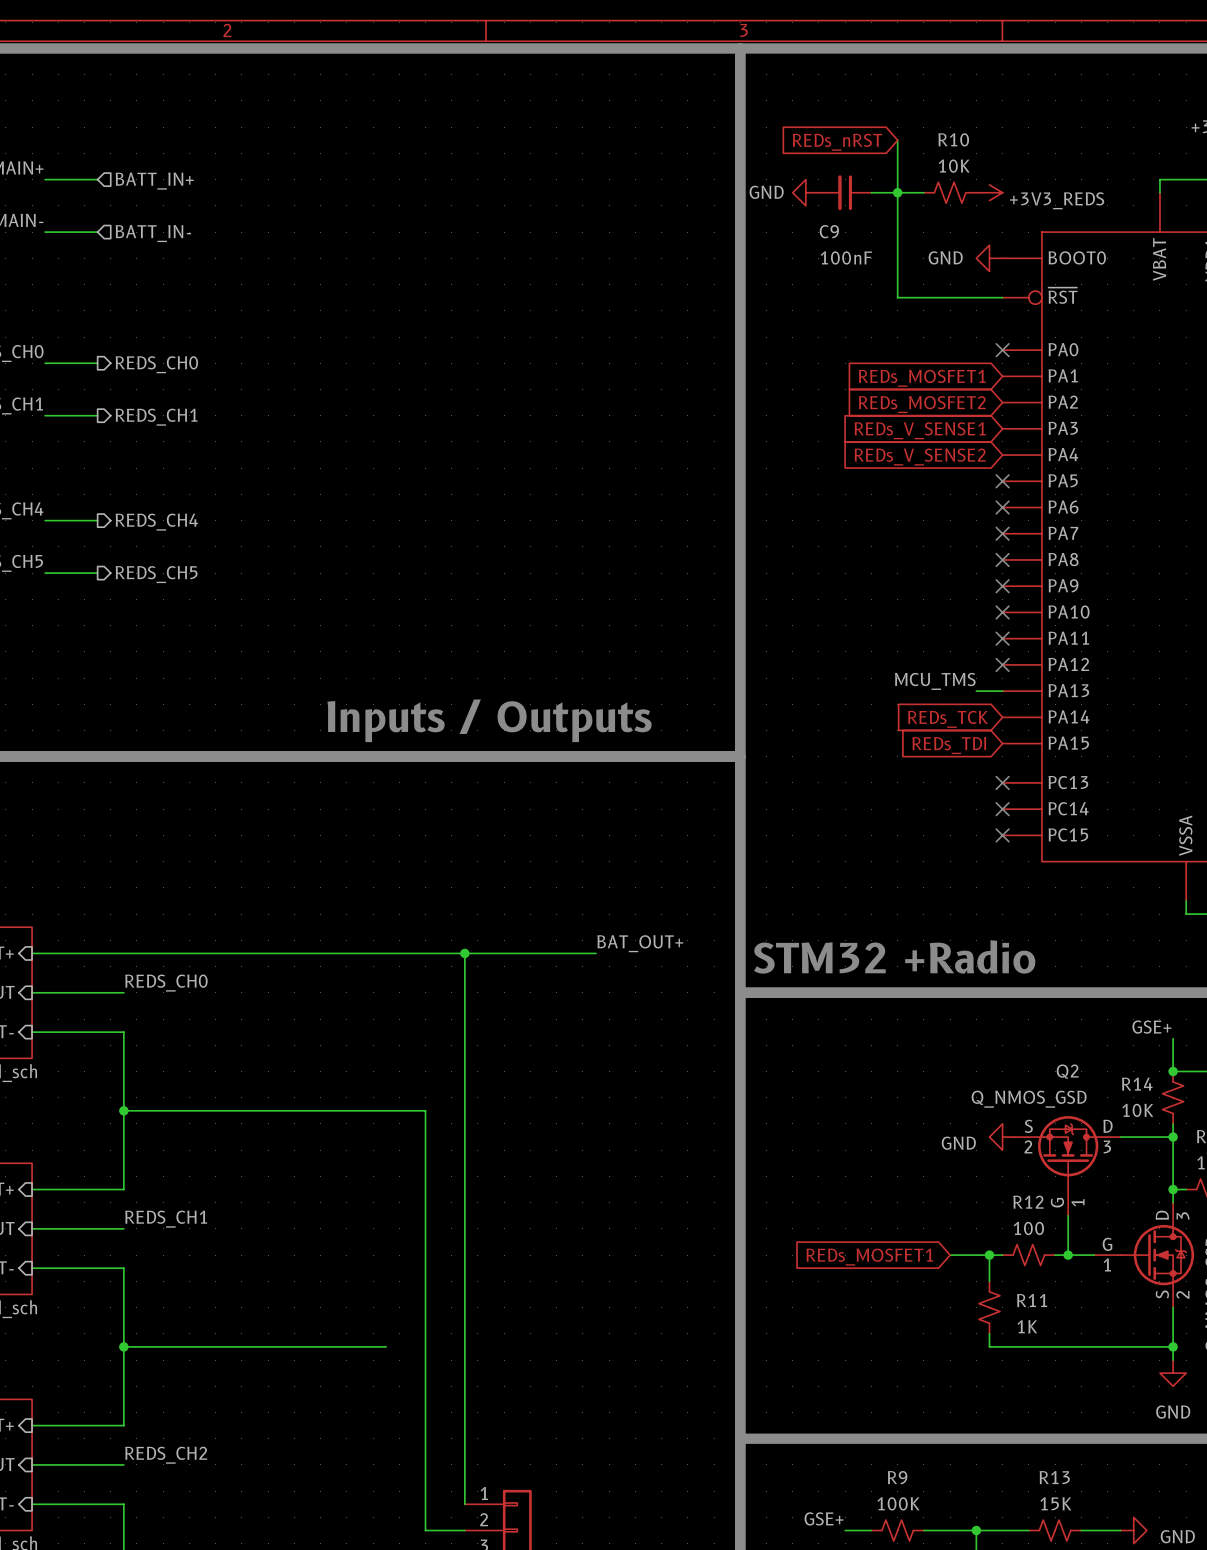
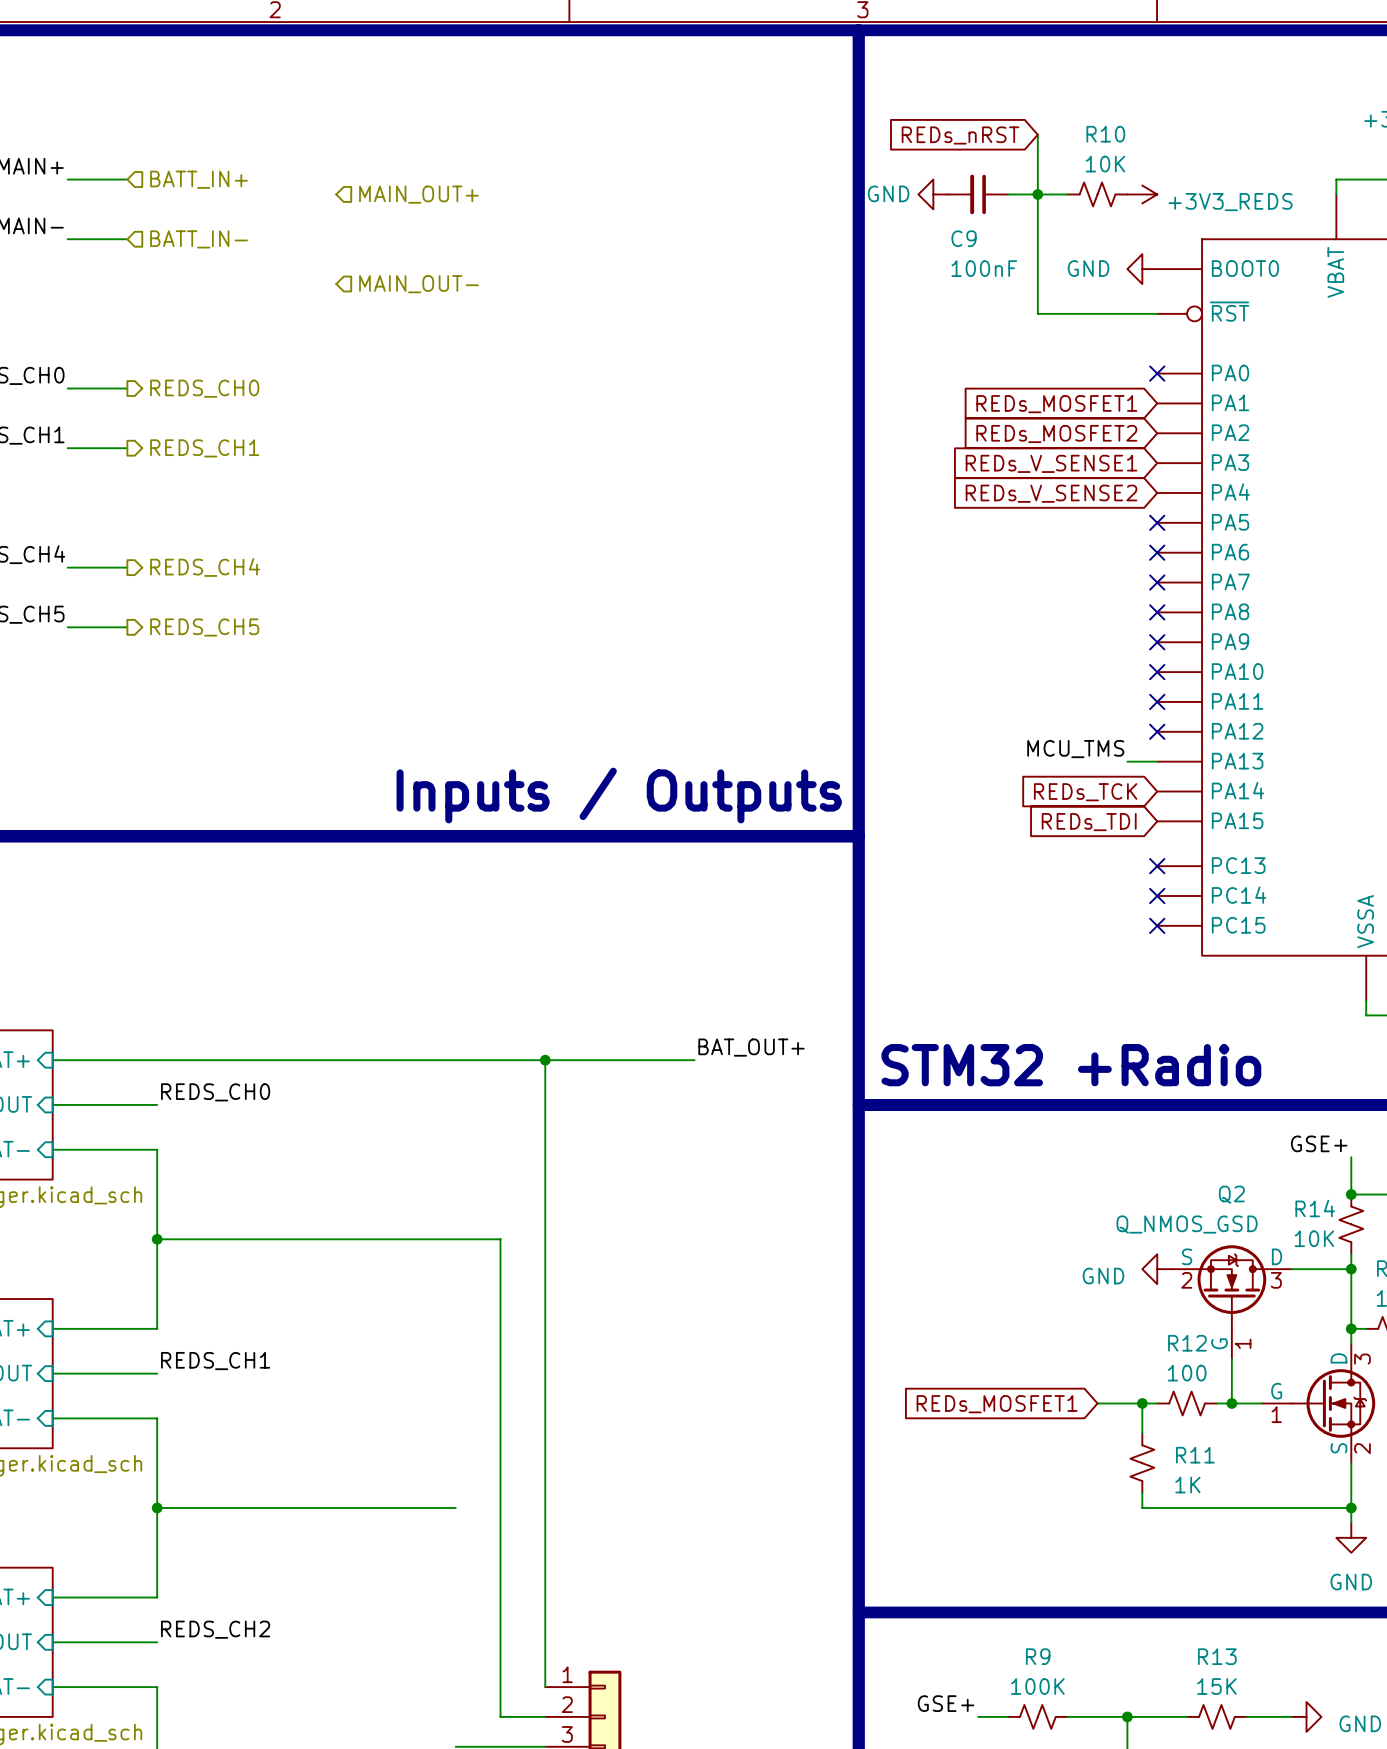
hierarchical label: none -> MAIN_OUT+ (418, 194)
hierarchical label: none -> MAIN_OUT- (418, 284)

